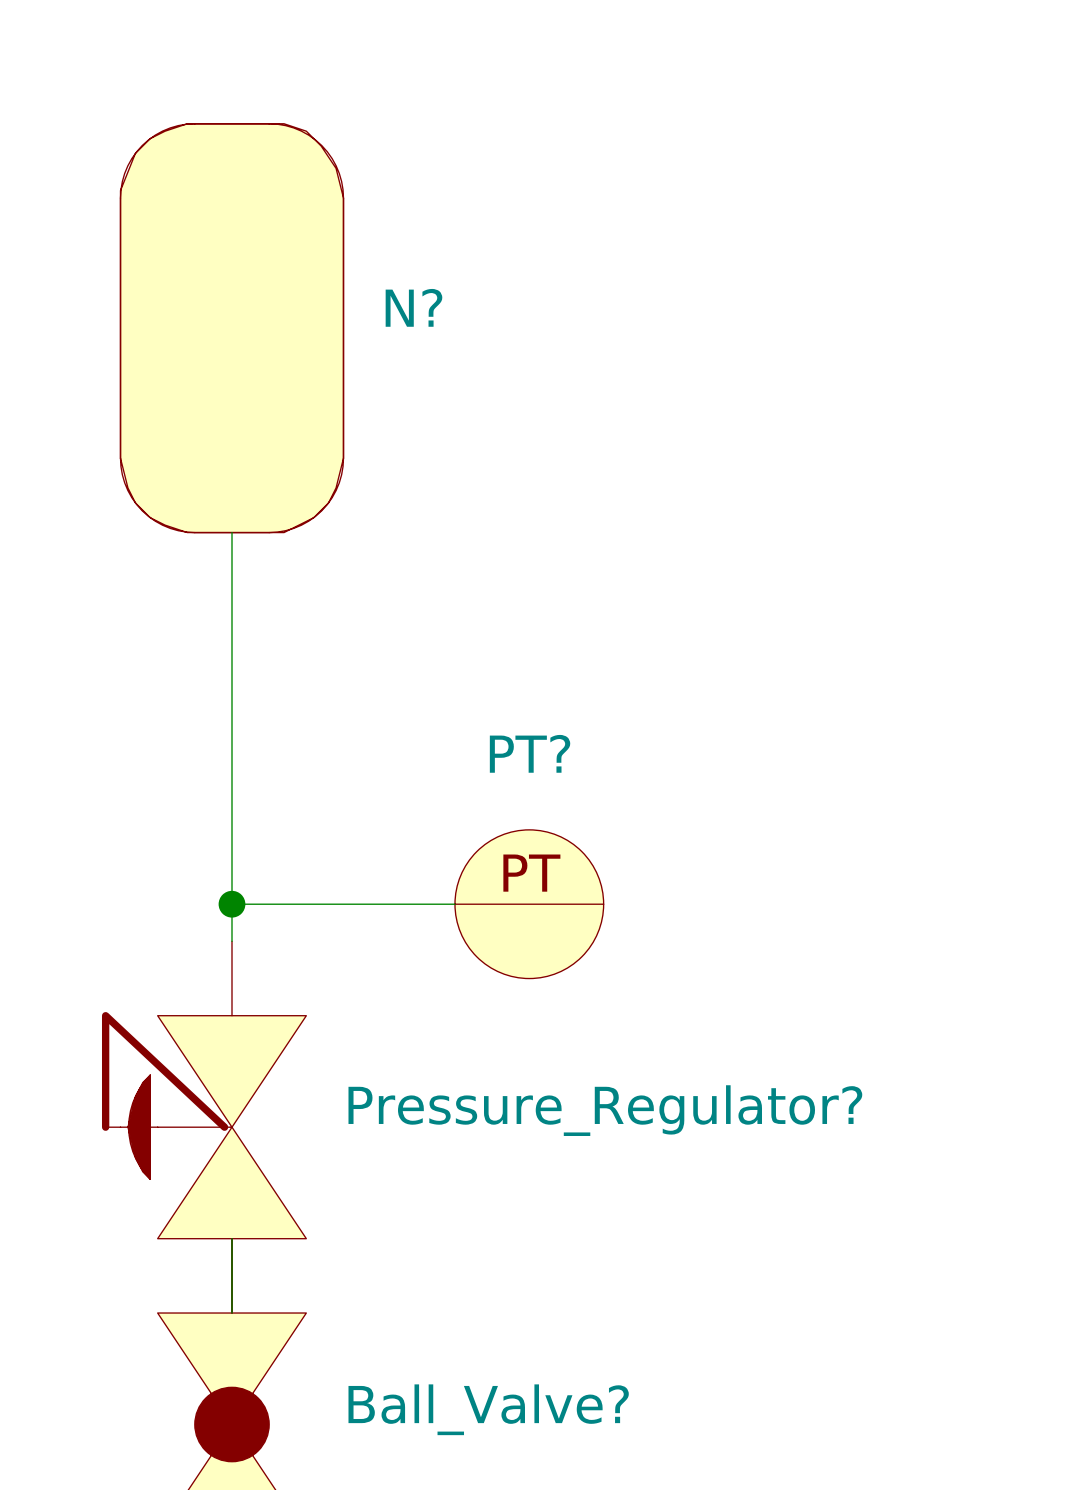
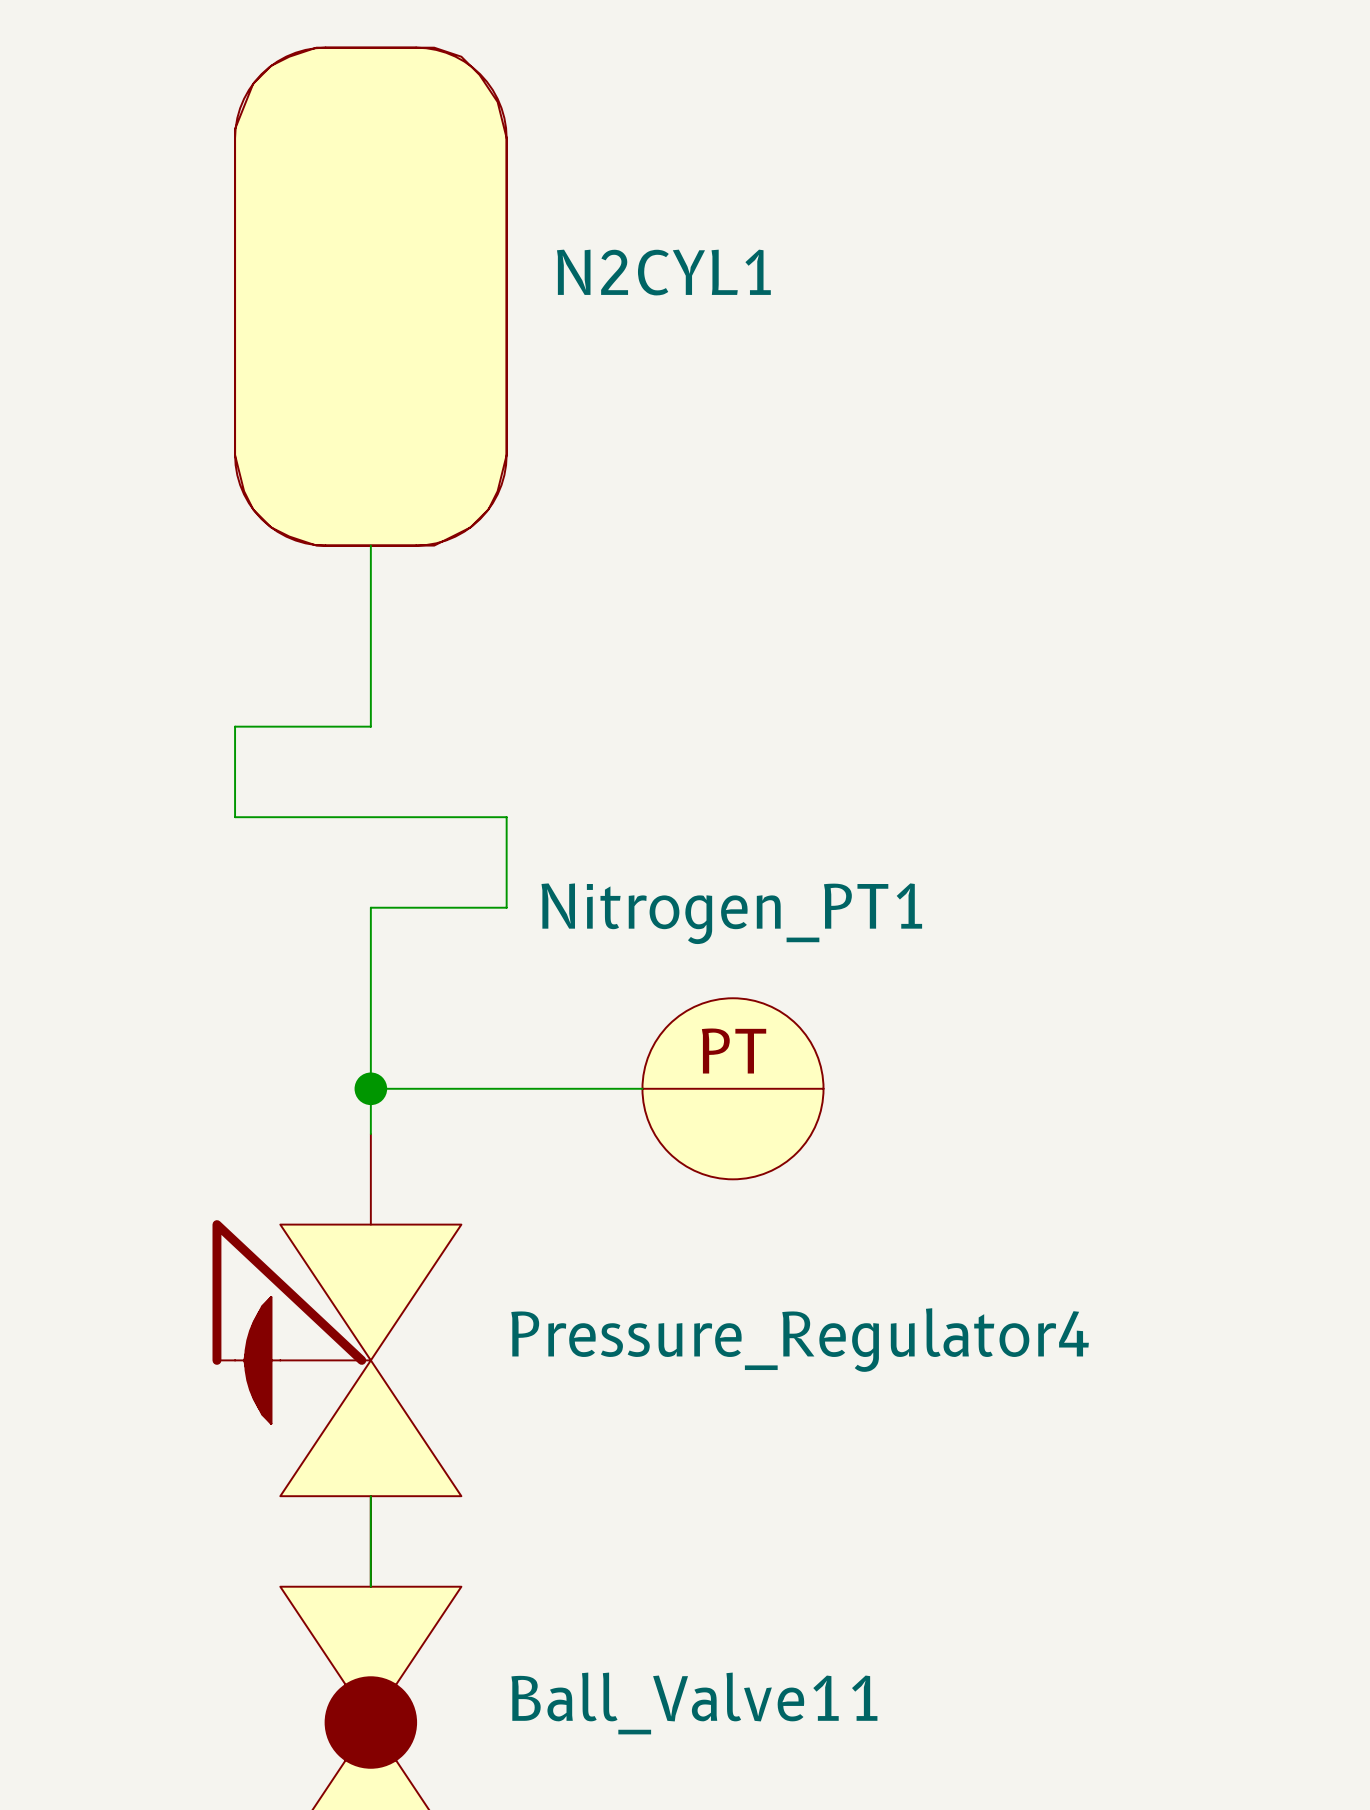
N2CYL1: none -> (370, 296)
N?: (232, 328) -> none
wire: (232, 606) (232, 755) -> (370, 726) (235, 726) (235, 817) (506, 817) (506, 907) (370, 907)
PT? name: PT? (530, 753) -> Nitrogen_PT1 (731, 913)
Pressure_Regulator? name: Pressure_Regulator? (605, 1110) -> Pressure_Regulator4 (800, 1340)
Ball_Valve? name: Ball_Valve? (488, 1409) -> Ball_Valve11 (694, 1703)

